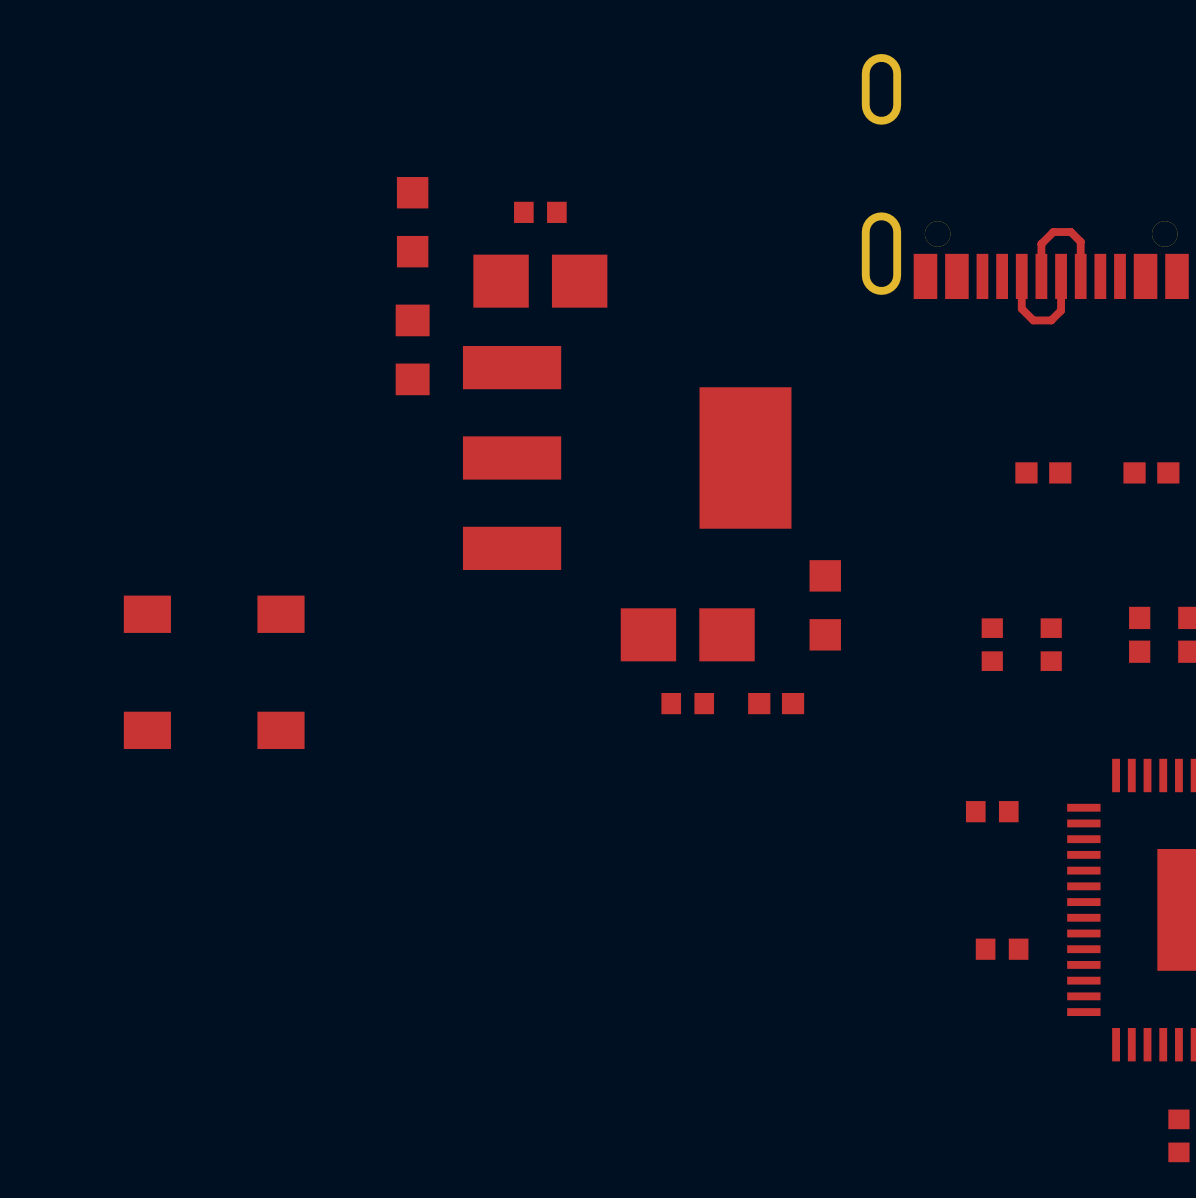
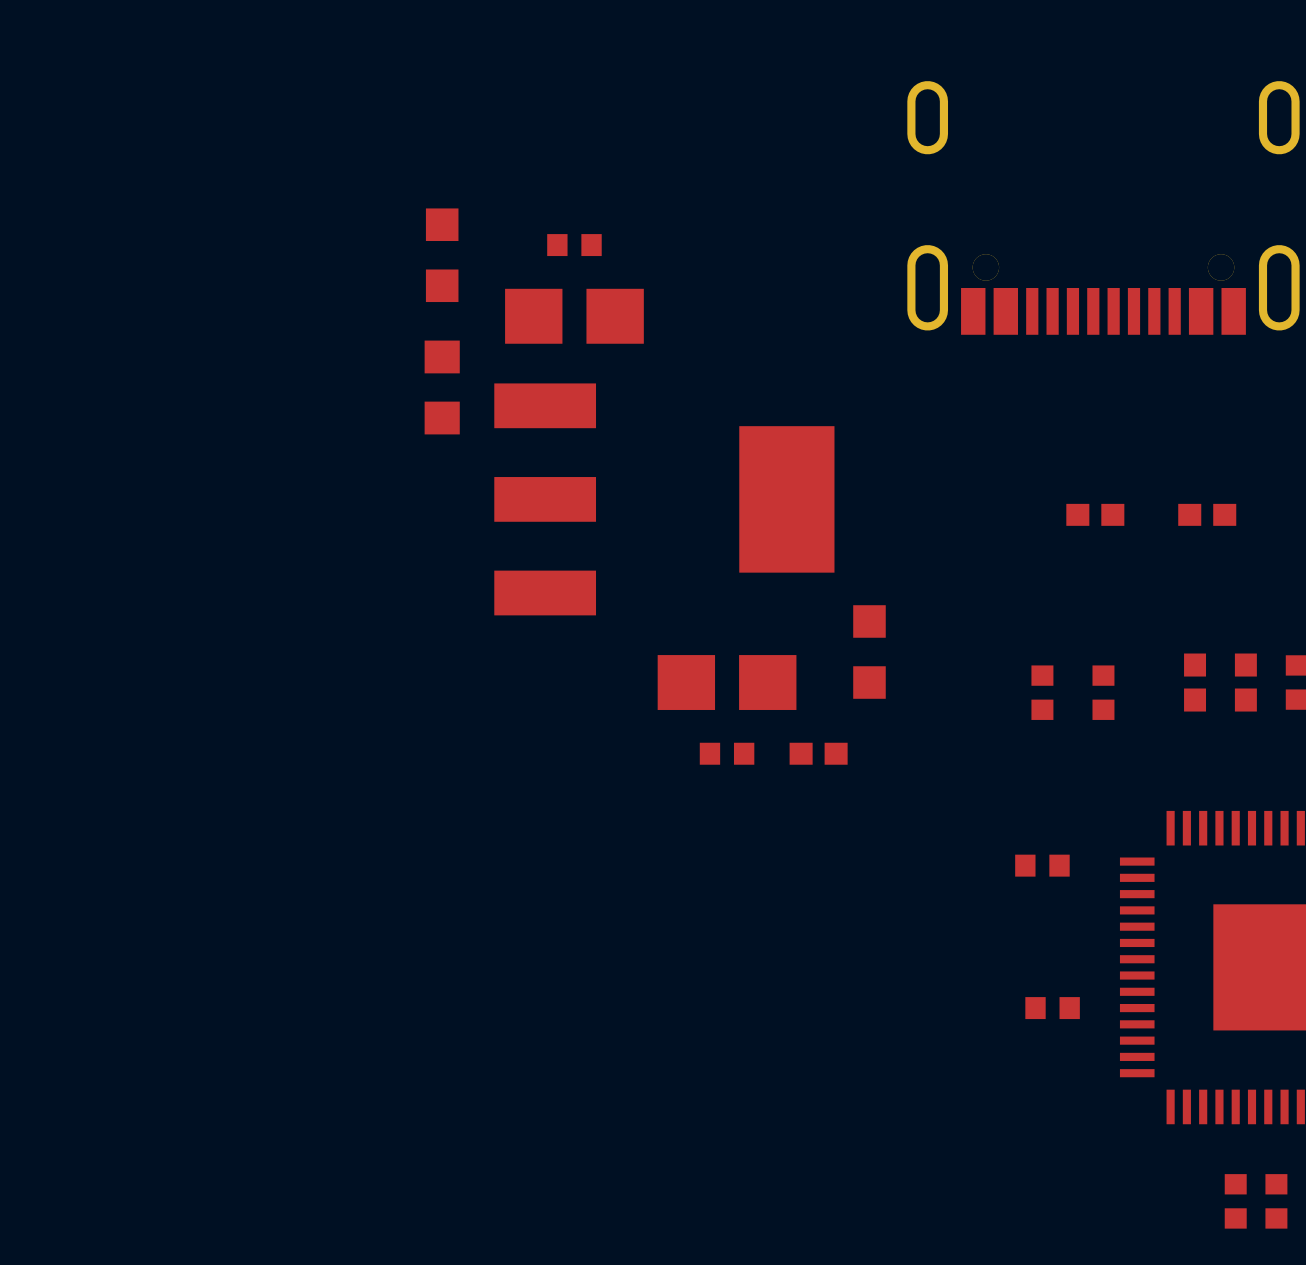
top track: (1061, 276) (1061, 310) (1051, 320) (1033, 320) (1021, 308) (1021, 276) -> none
top track: (1080, 276) (1080, 241) (1070, 232) (1053, 232) (1041, 244) (1041, 276) -> none
part: (214, 614) -> none
part: (214, 730) -> none

